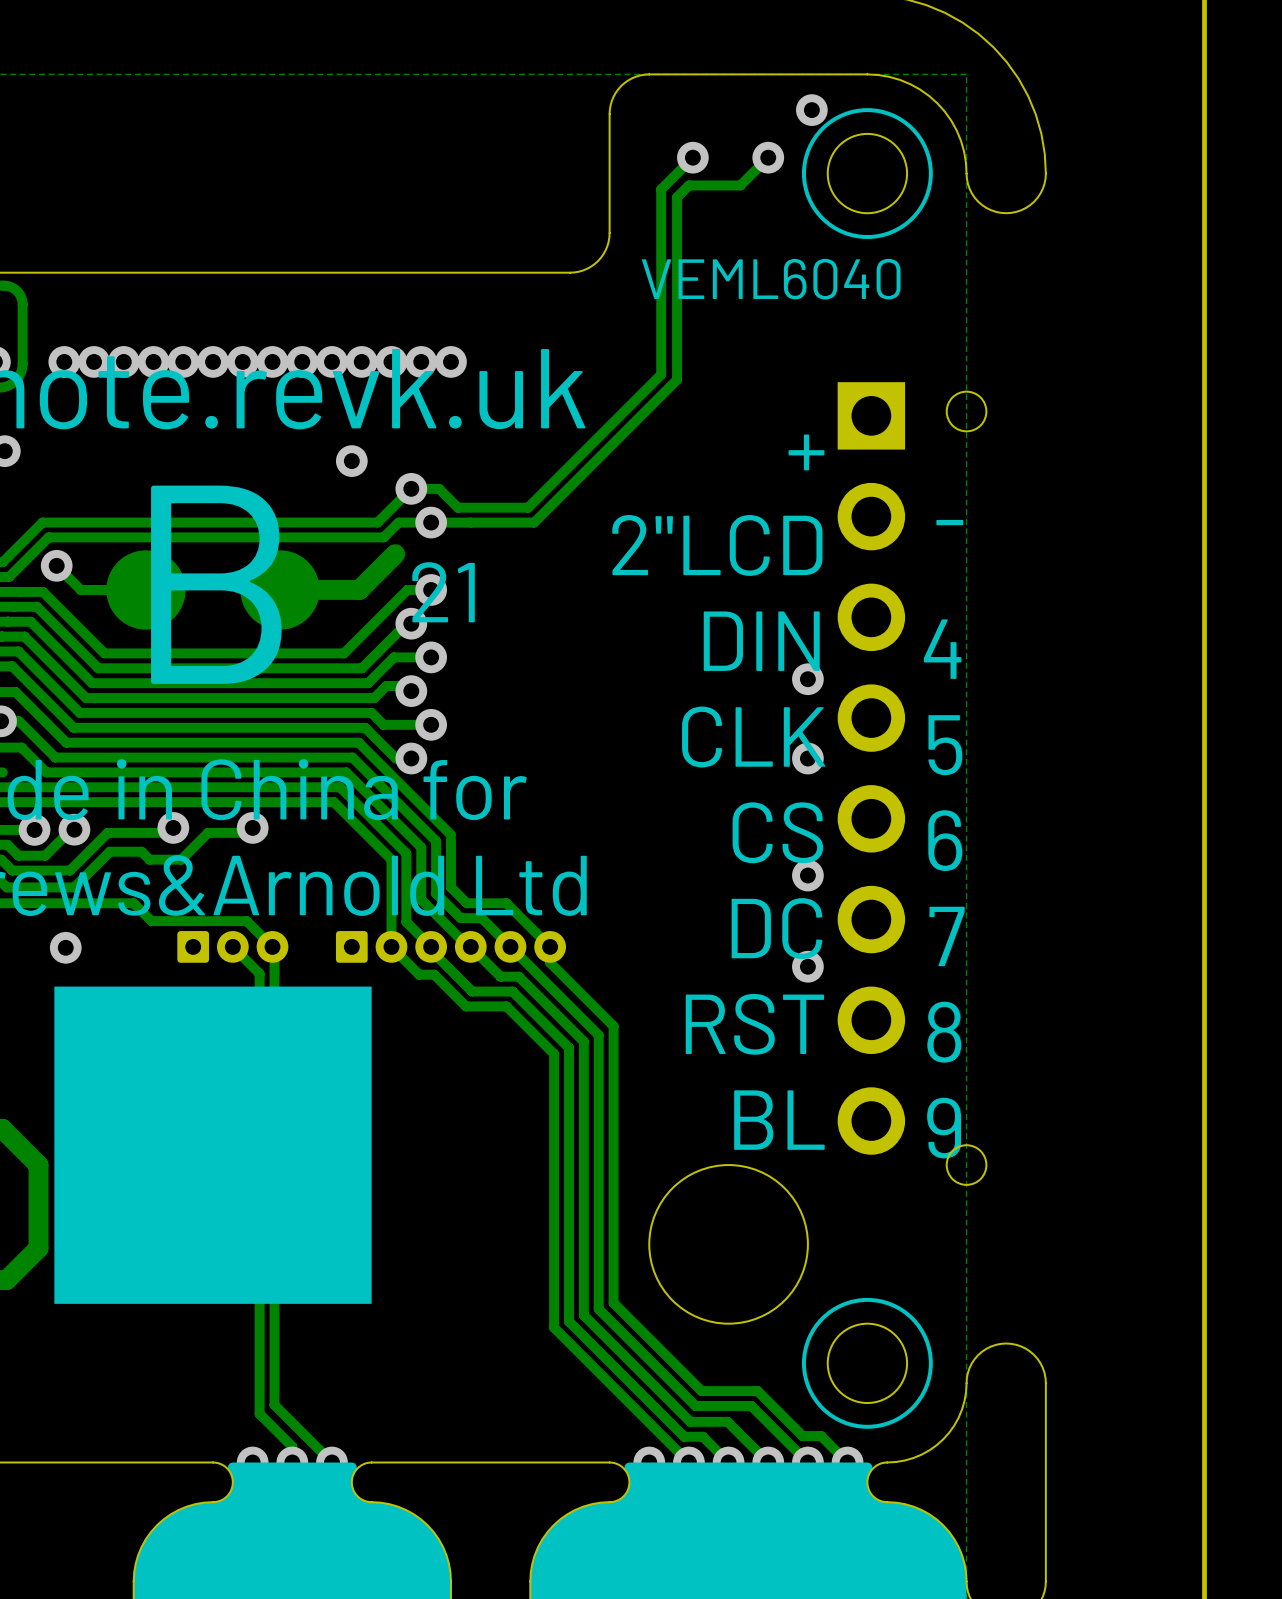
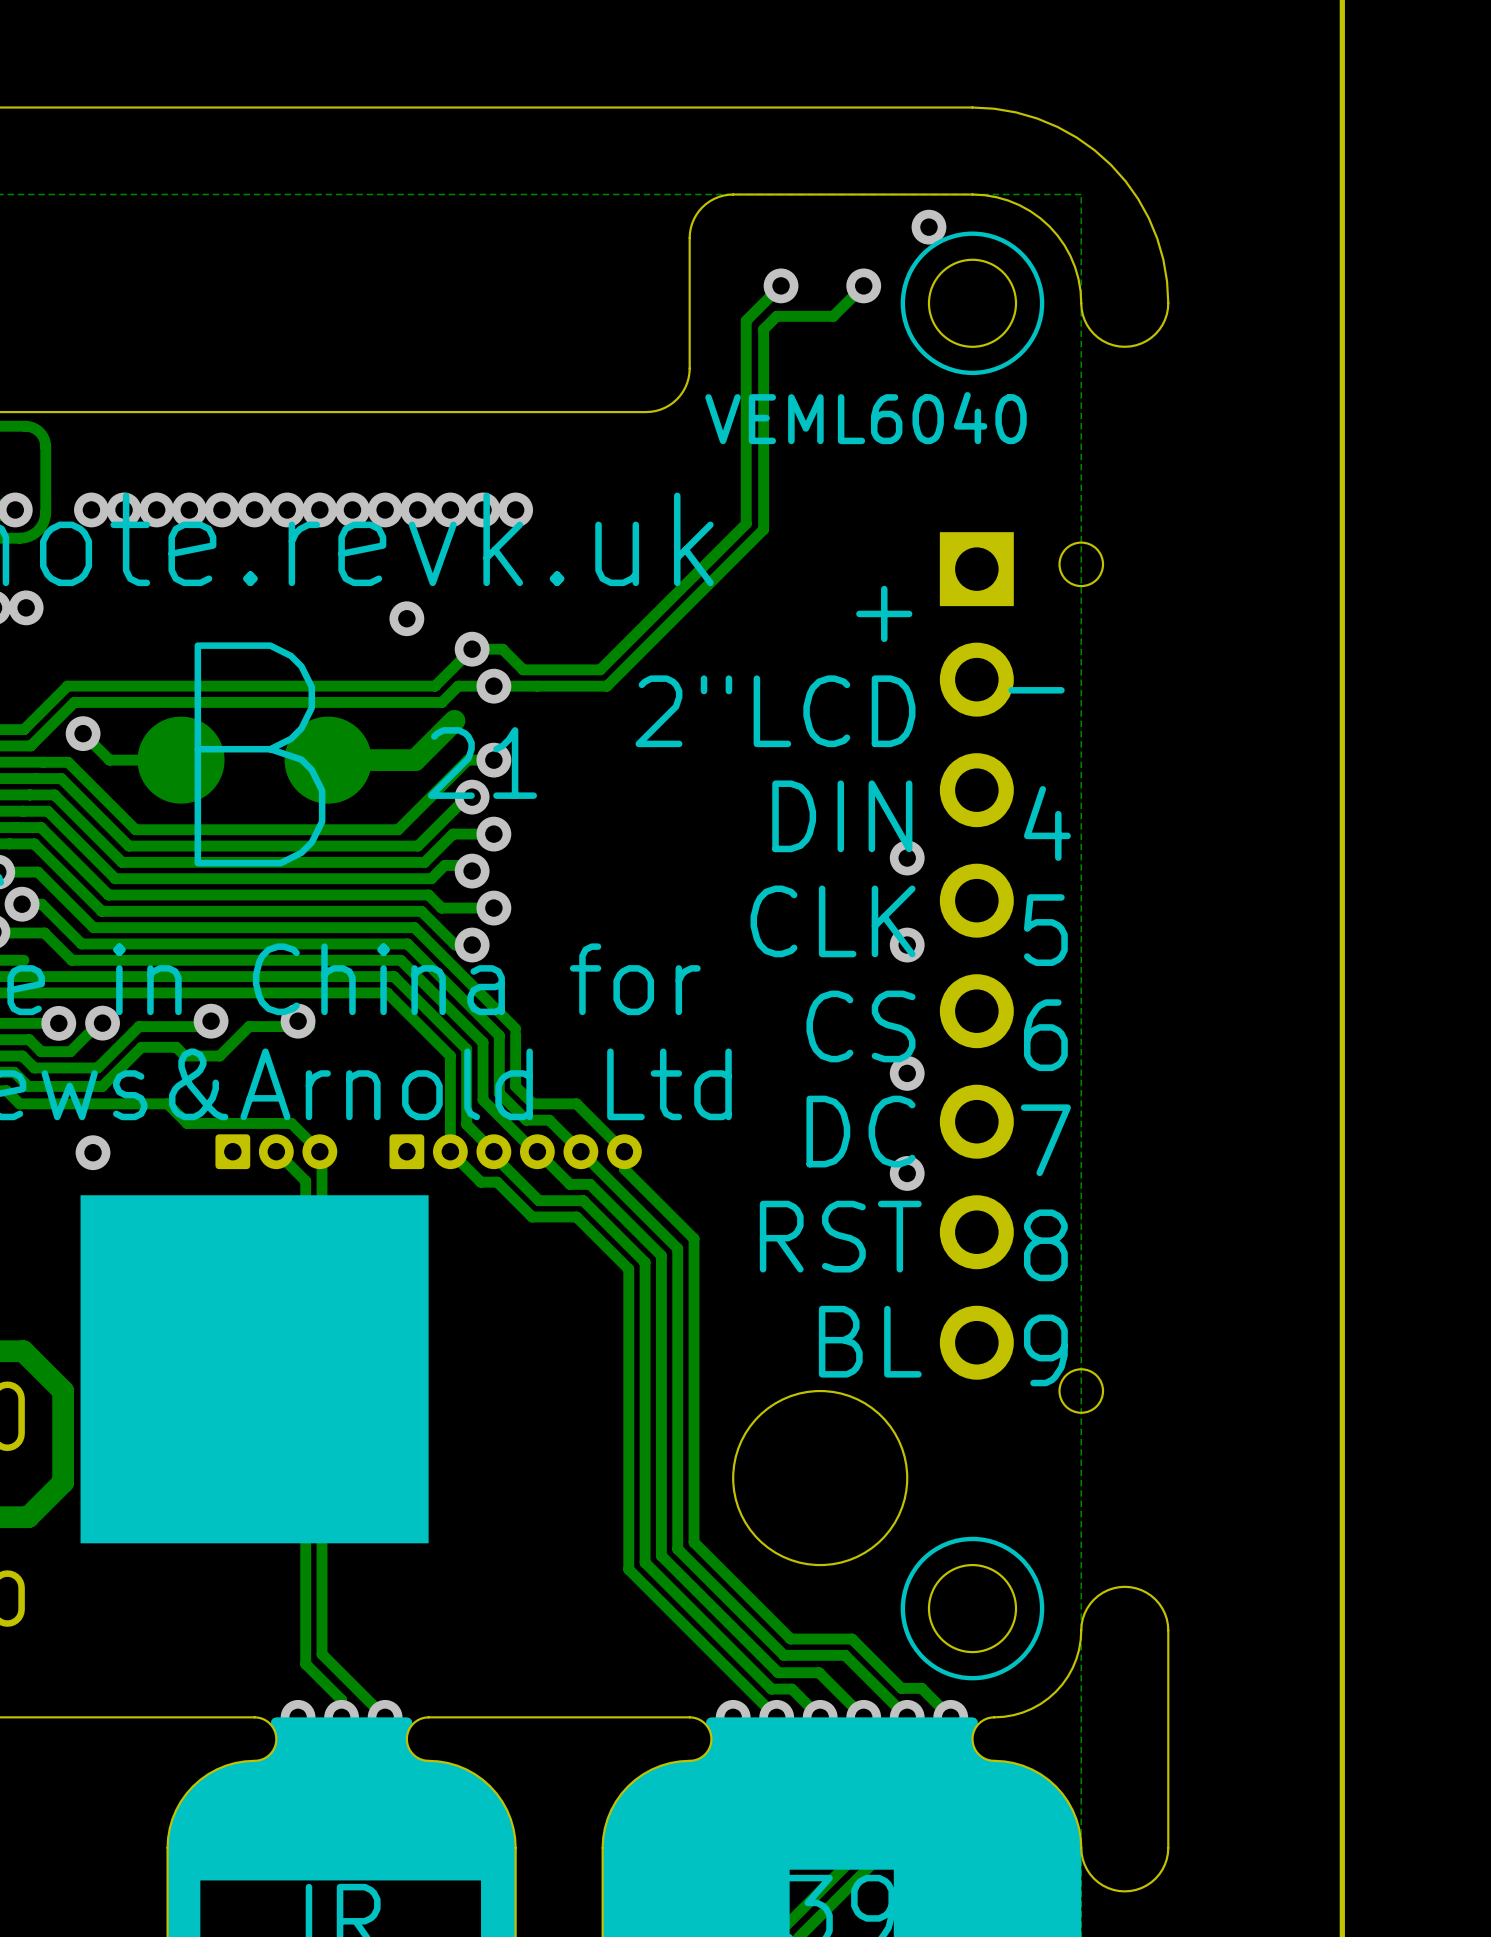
via position: (811, 110) -> (928, 227)

